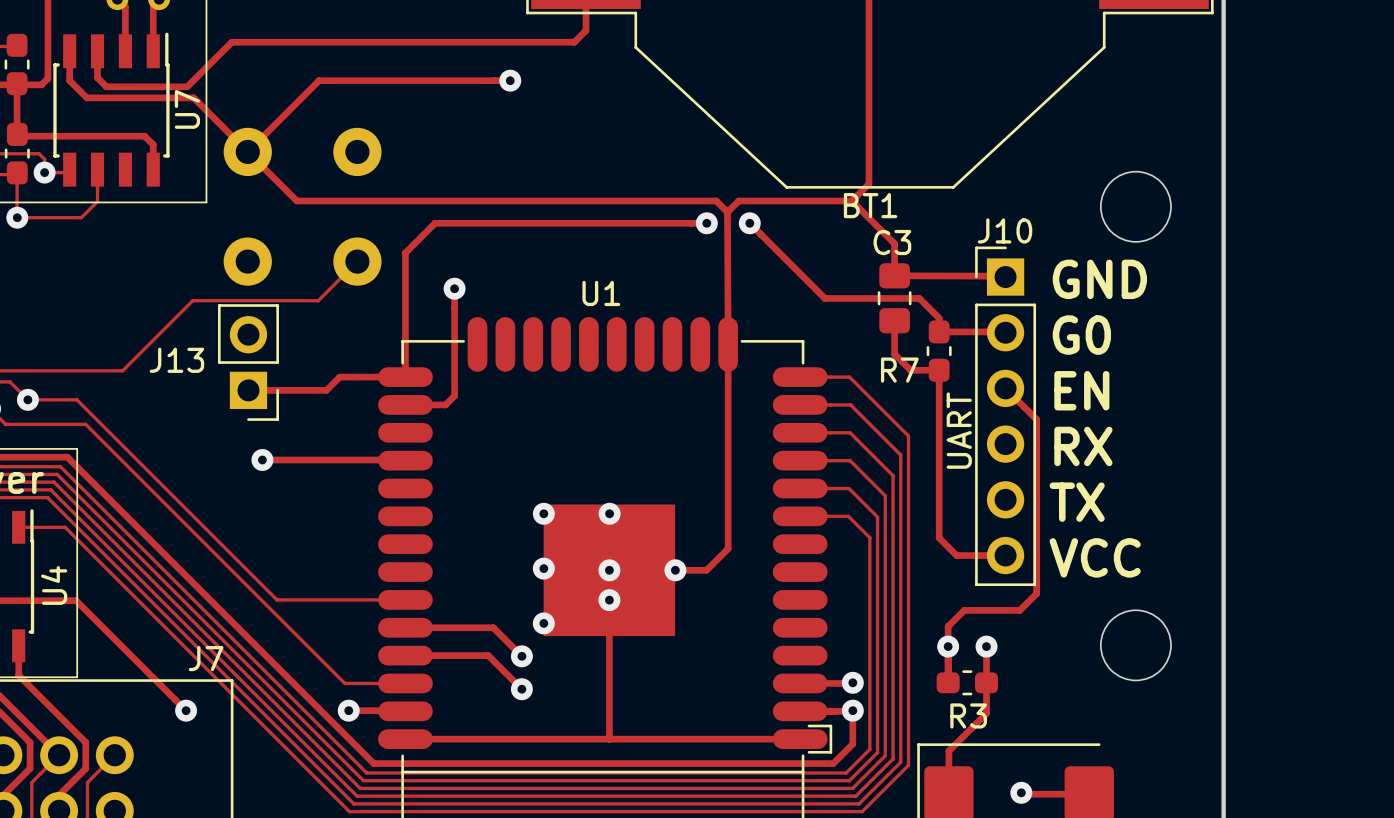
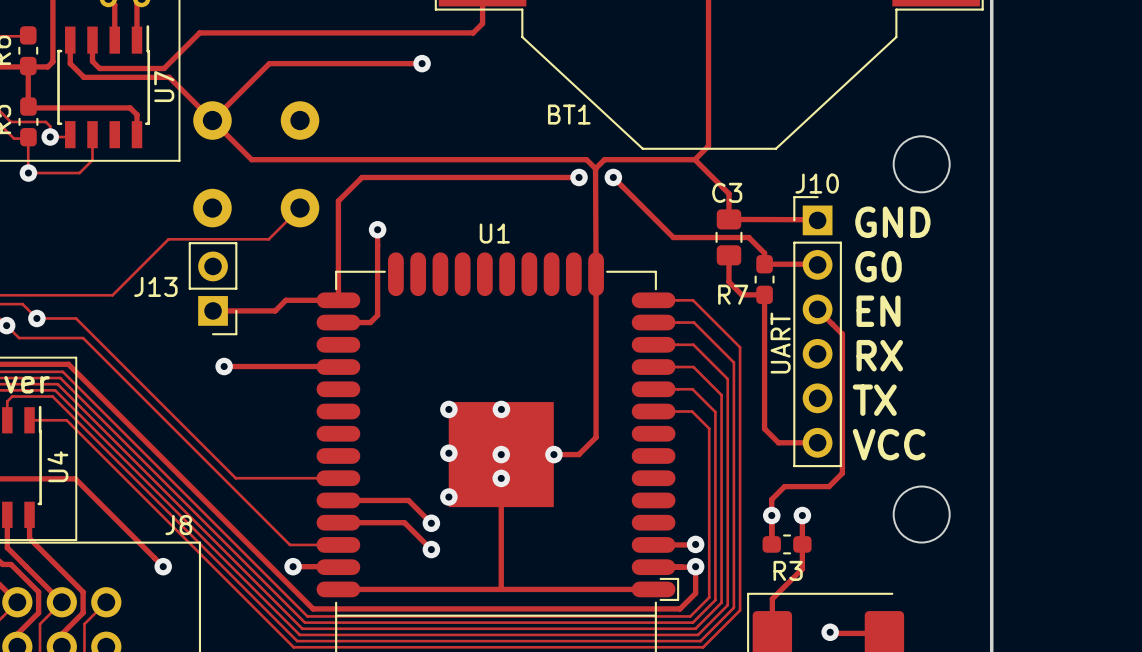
BT1 name position: BT1 (870, 205) -> BT1 (569, 114)
J7 name: J7 (206, 658) -> J8 (178, 525)

